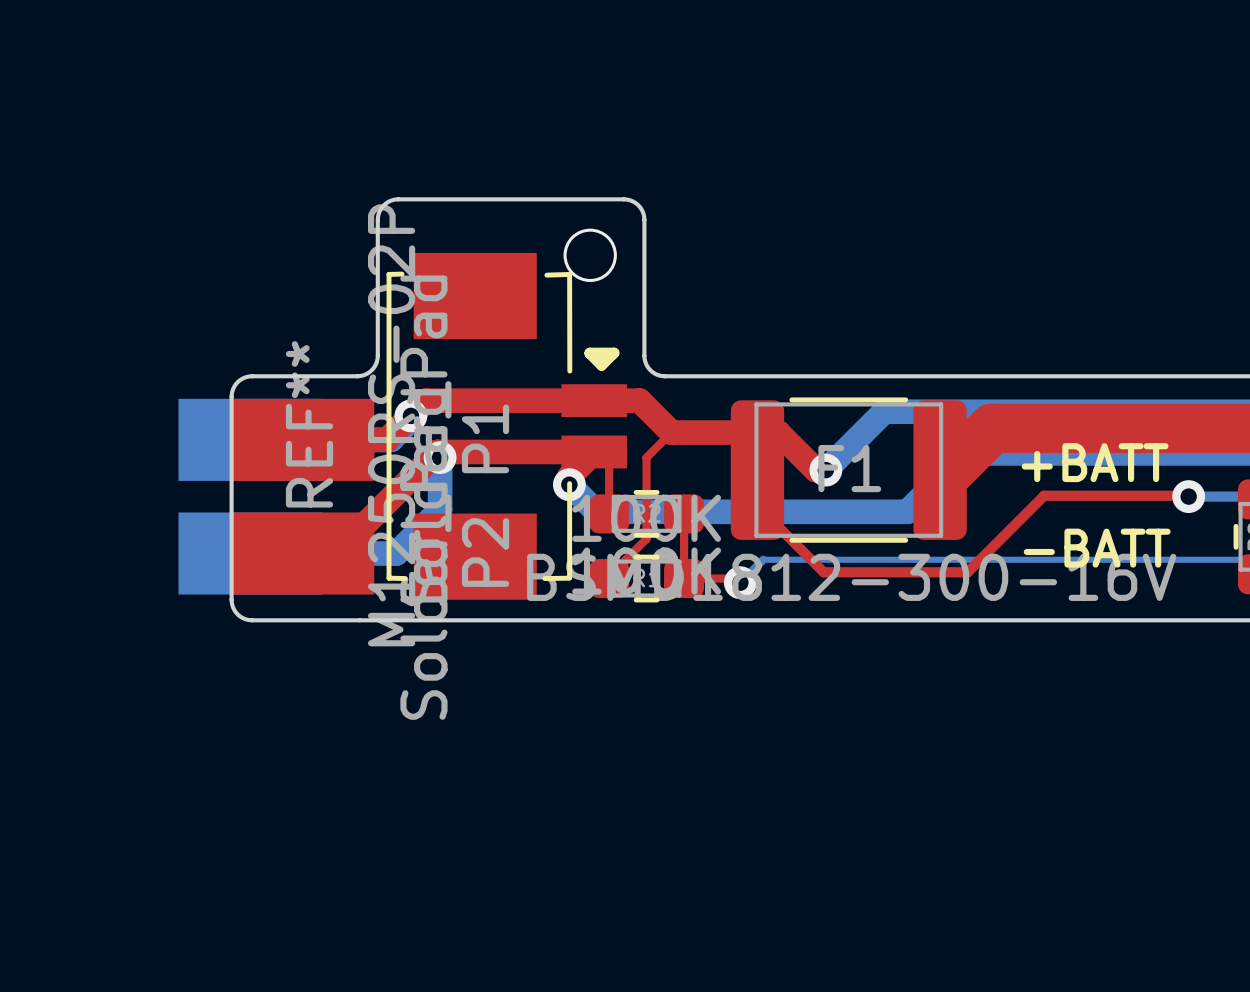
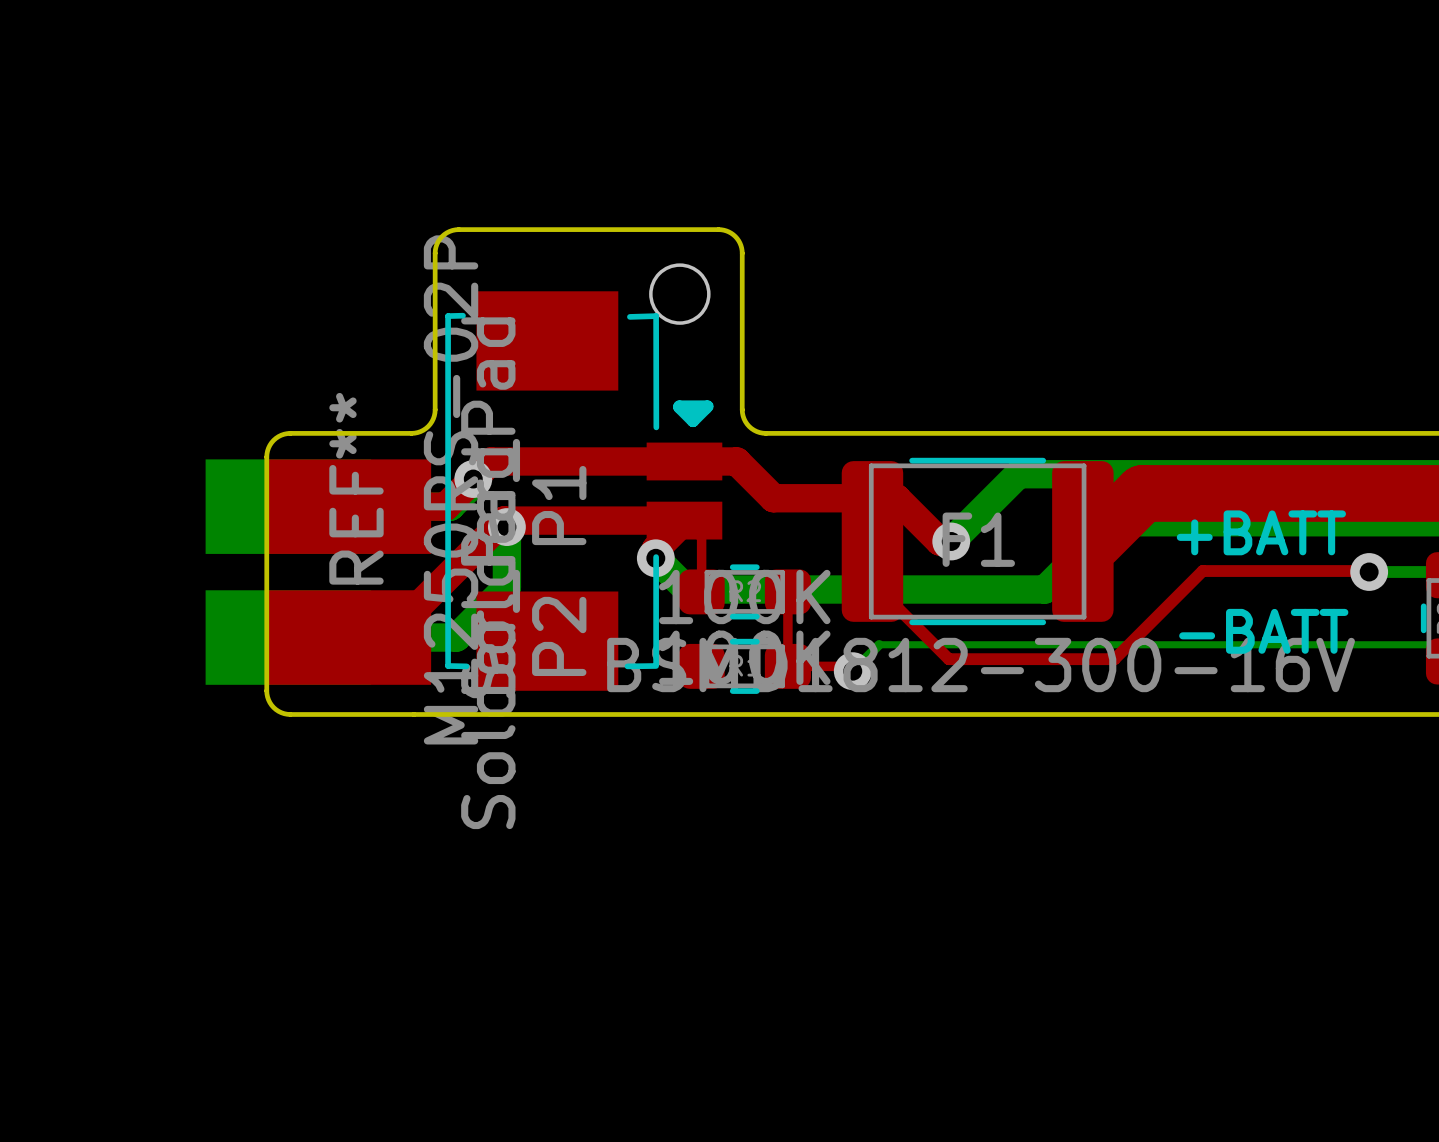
top track: (671, 432) (646, 457) (646, 538) (609, 576) (609, 578) -> none

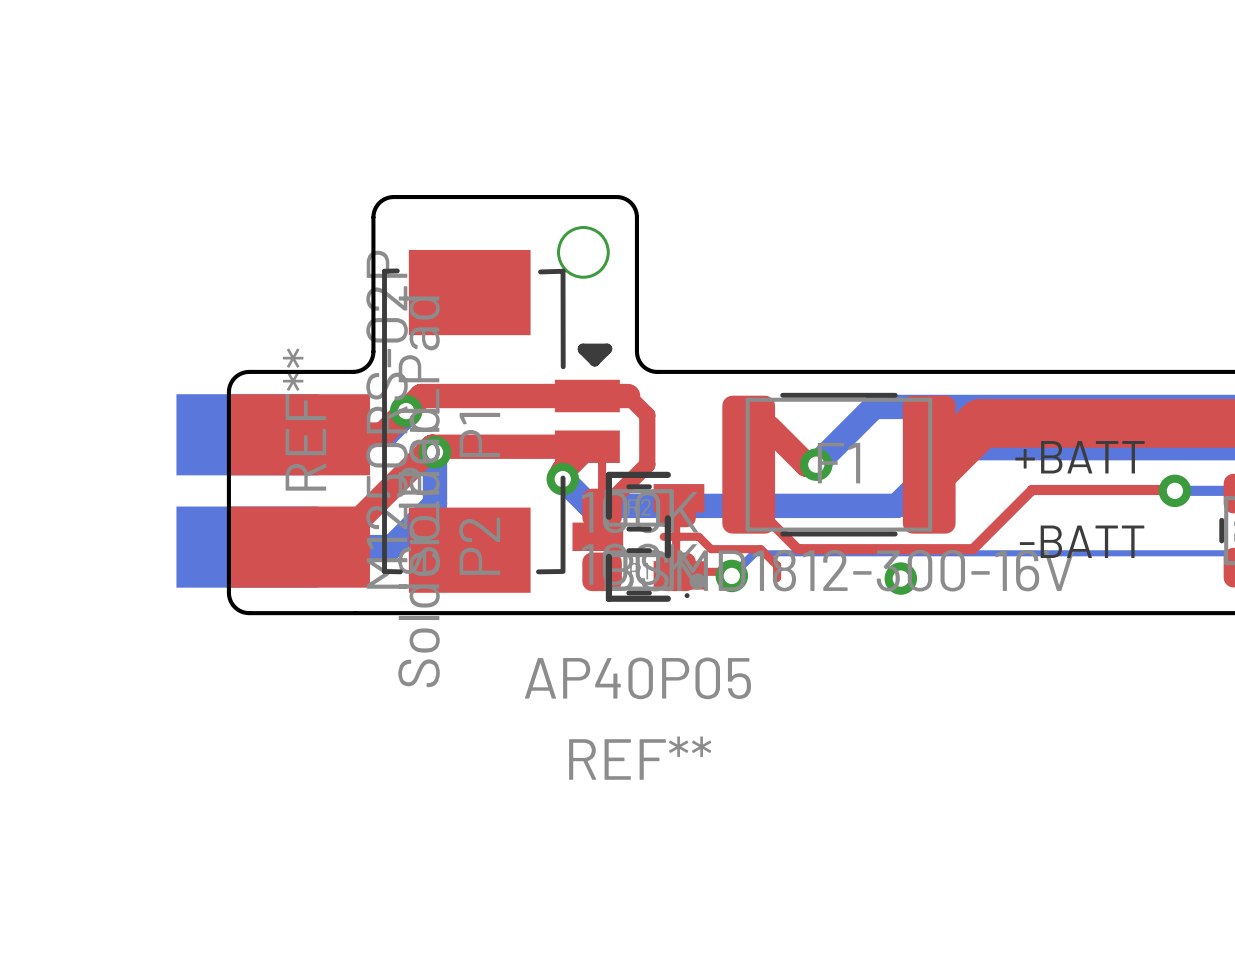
top track: (731, 461) (736, 461) (773, 498) (896, 498) -> (628, 396) (647, 415) (647, 464) (598, 513) (598, 540)
part: none -> AP40P05 (639, 536)
top track: none -> (663, 536) (698, 536) (711, 549) (760, 549) (777, 565) (777, 578)
top track: (929, 639) (948, 659) (1114, 659) (1133, 639) -> (797, 549) (972, 549)
via: none -> (900, 578)

